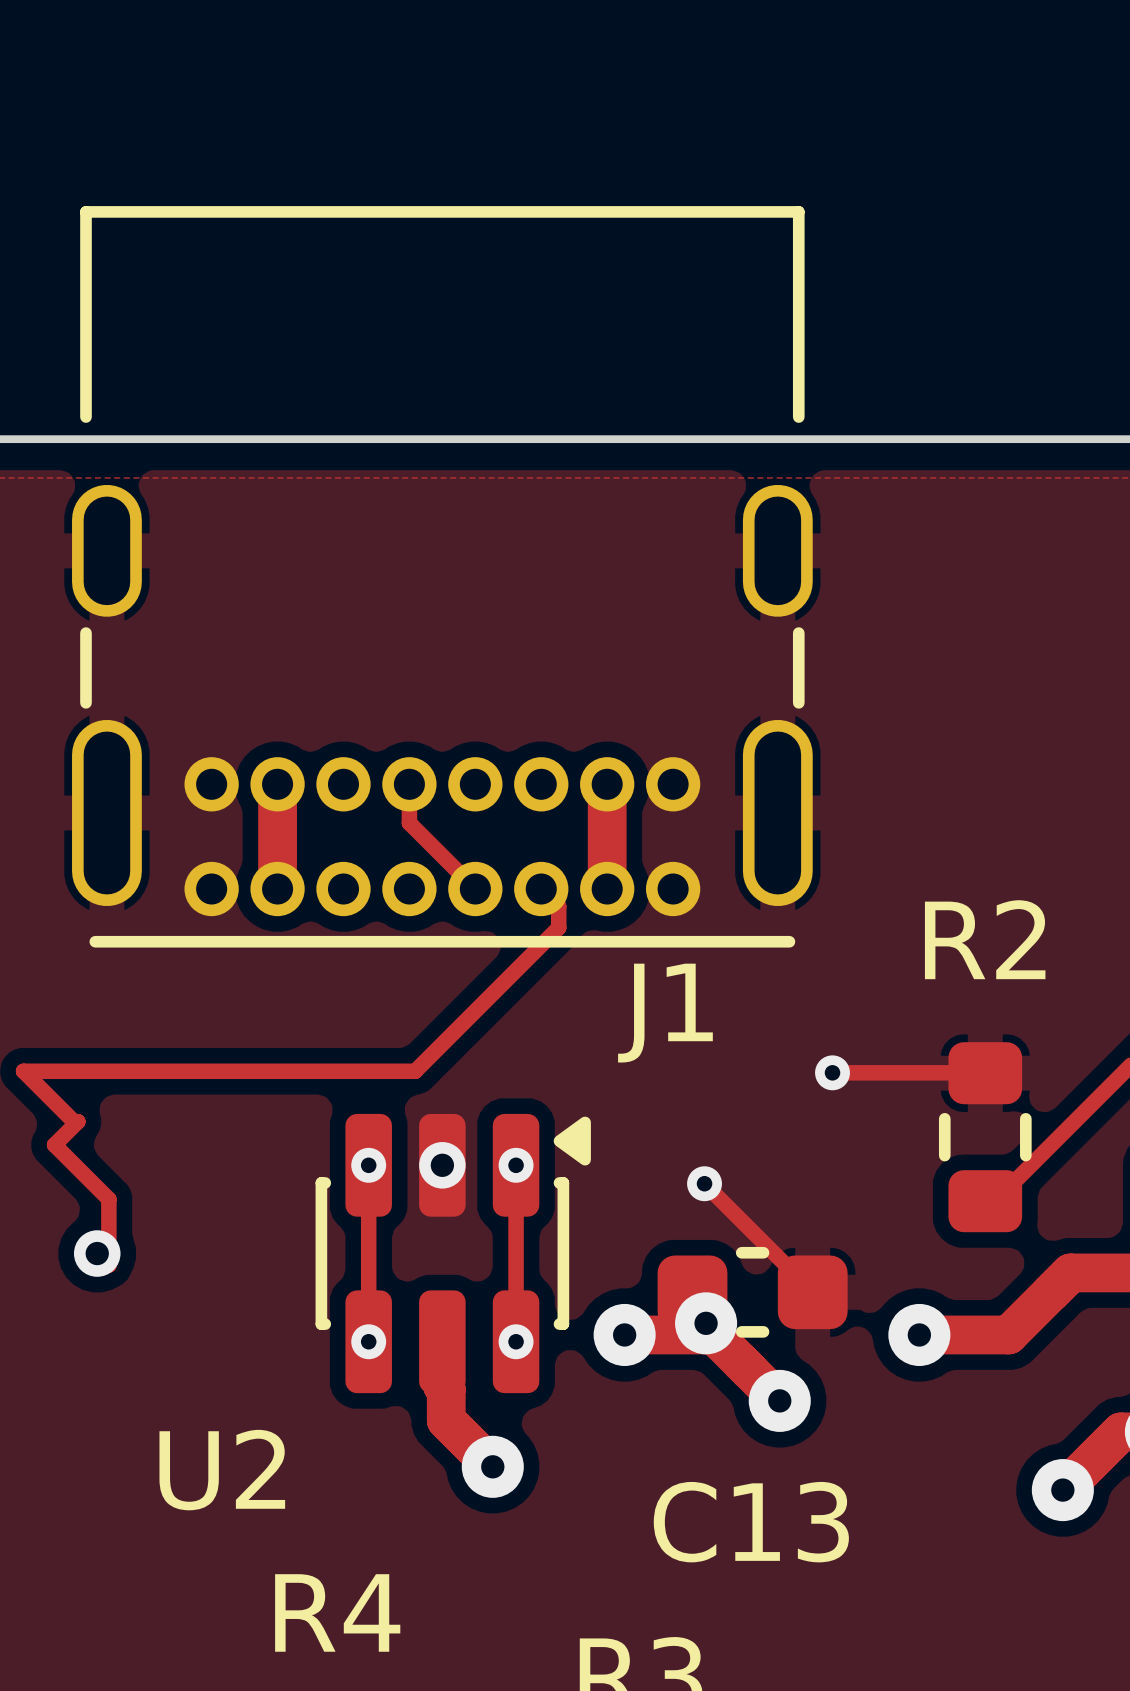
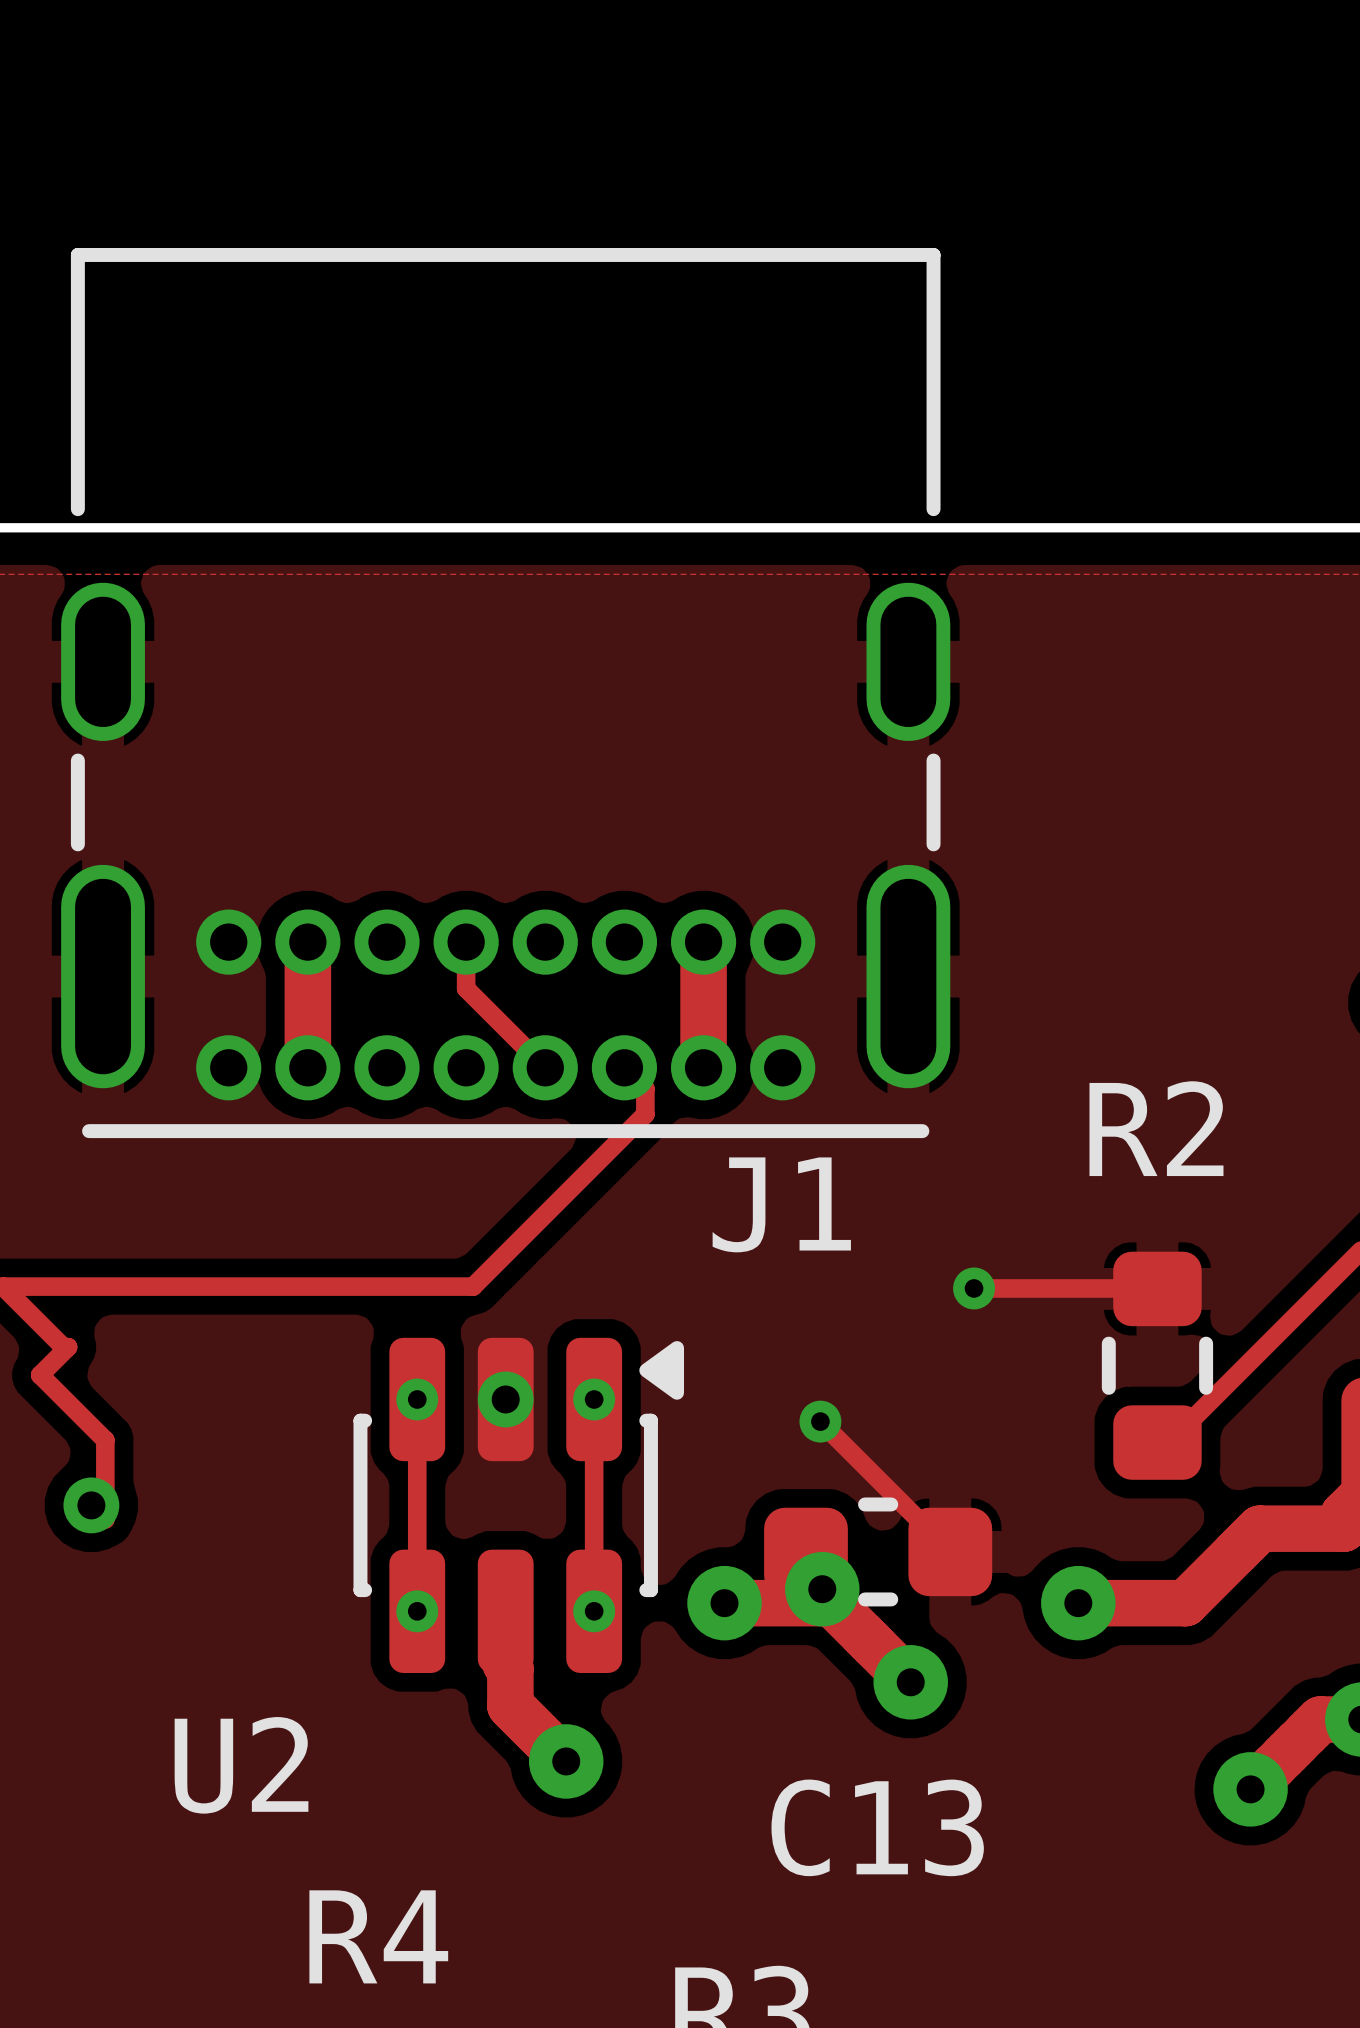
J1 footprint: [72, 206, 813, 948] -> [61, 248, 951, 1139]

